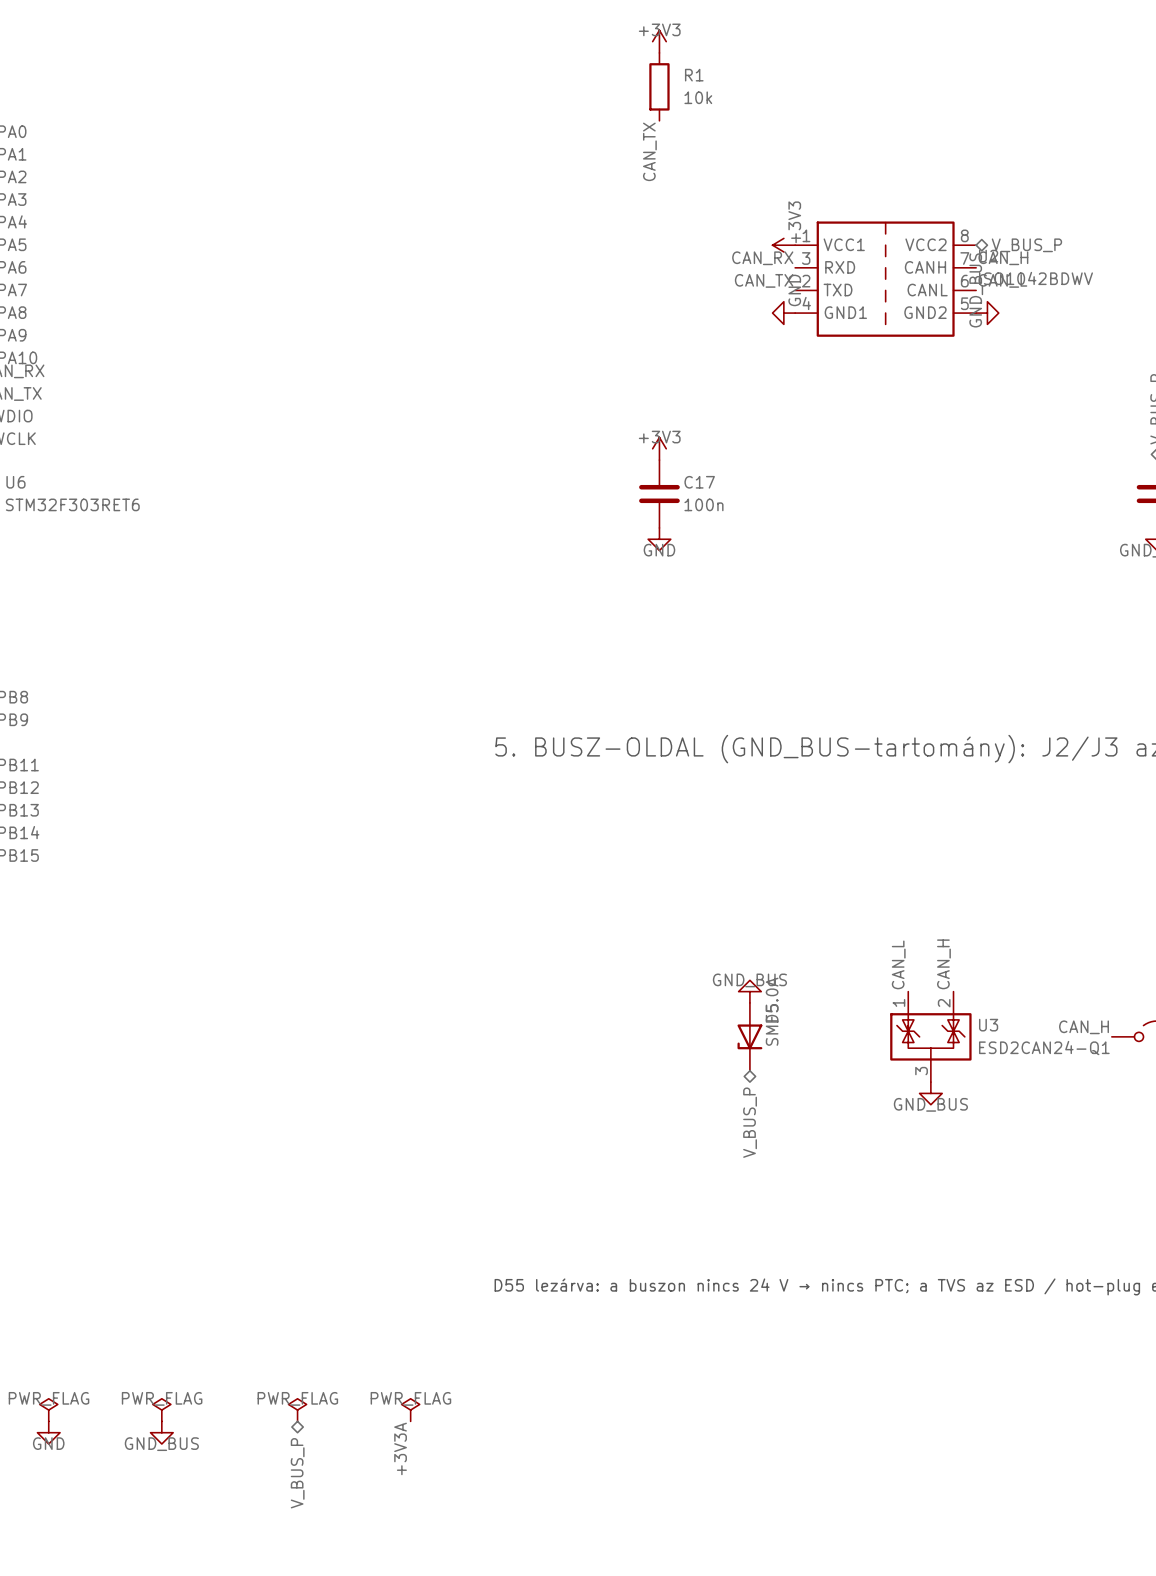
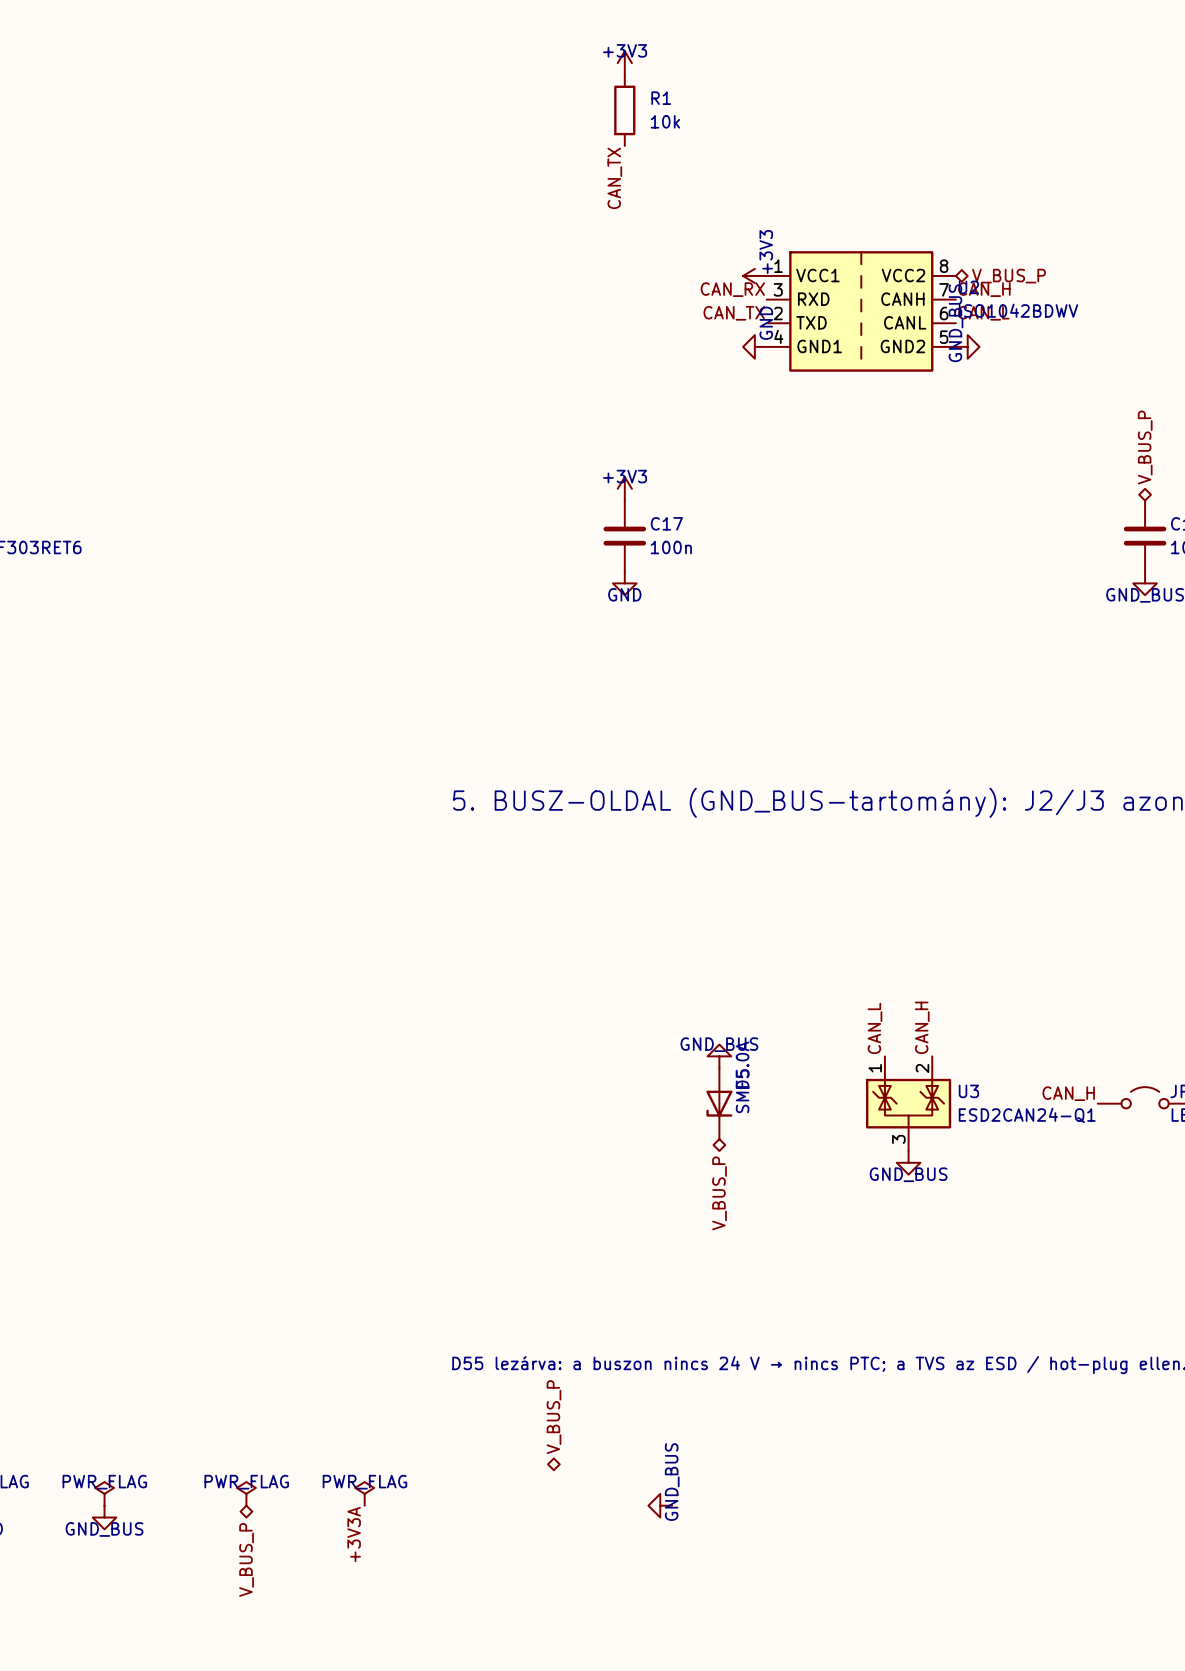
hierarchical label: none -> V_BUS_P (553, 1417)
power symbol: none -> GND_BUS (660, 1505)

